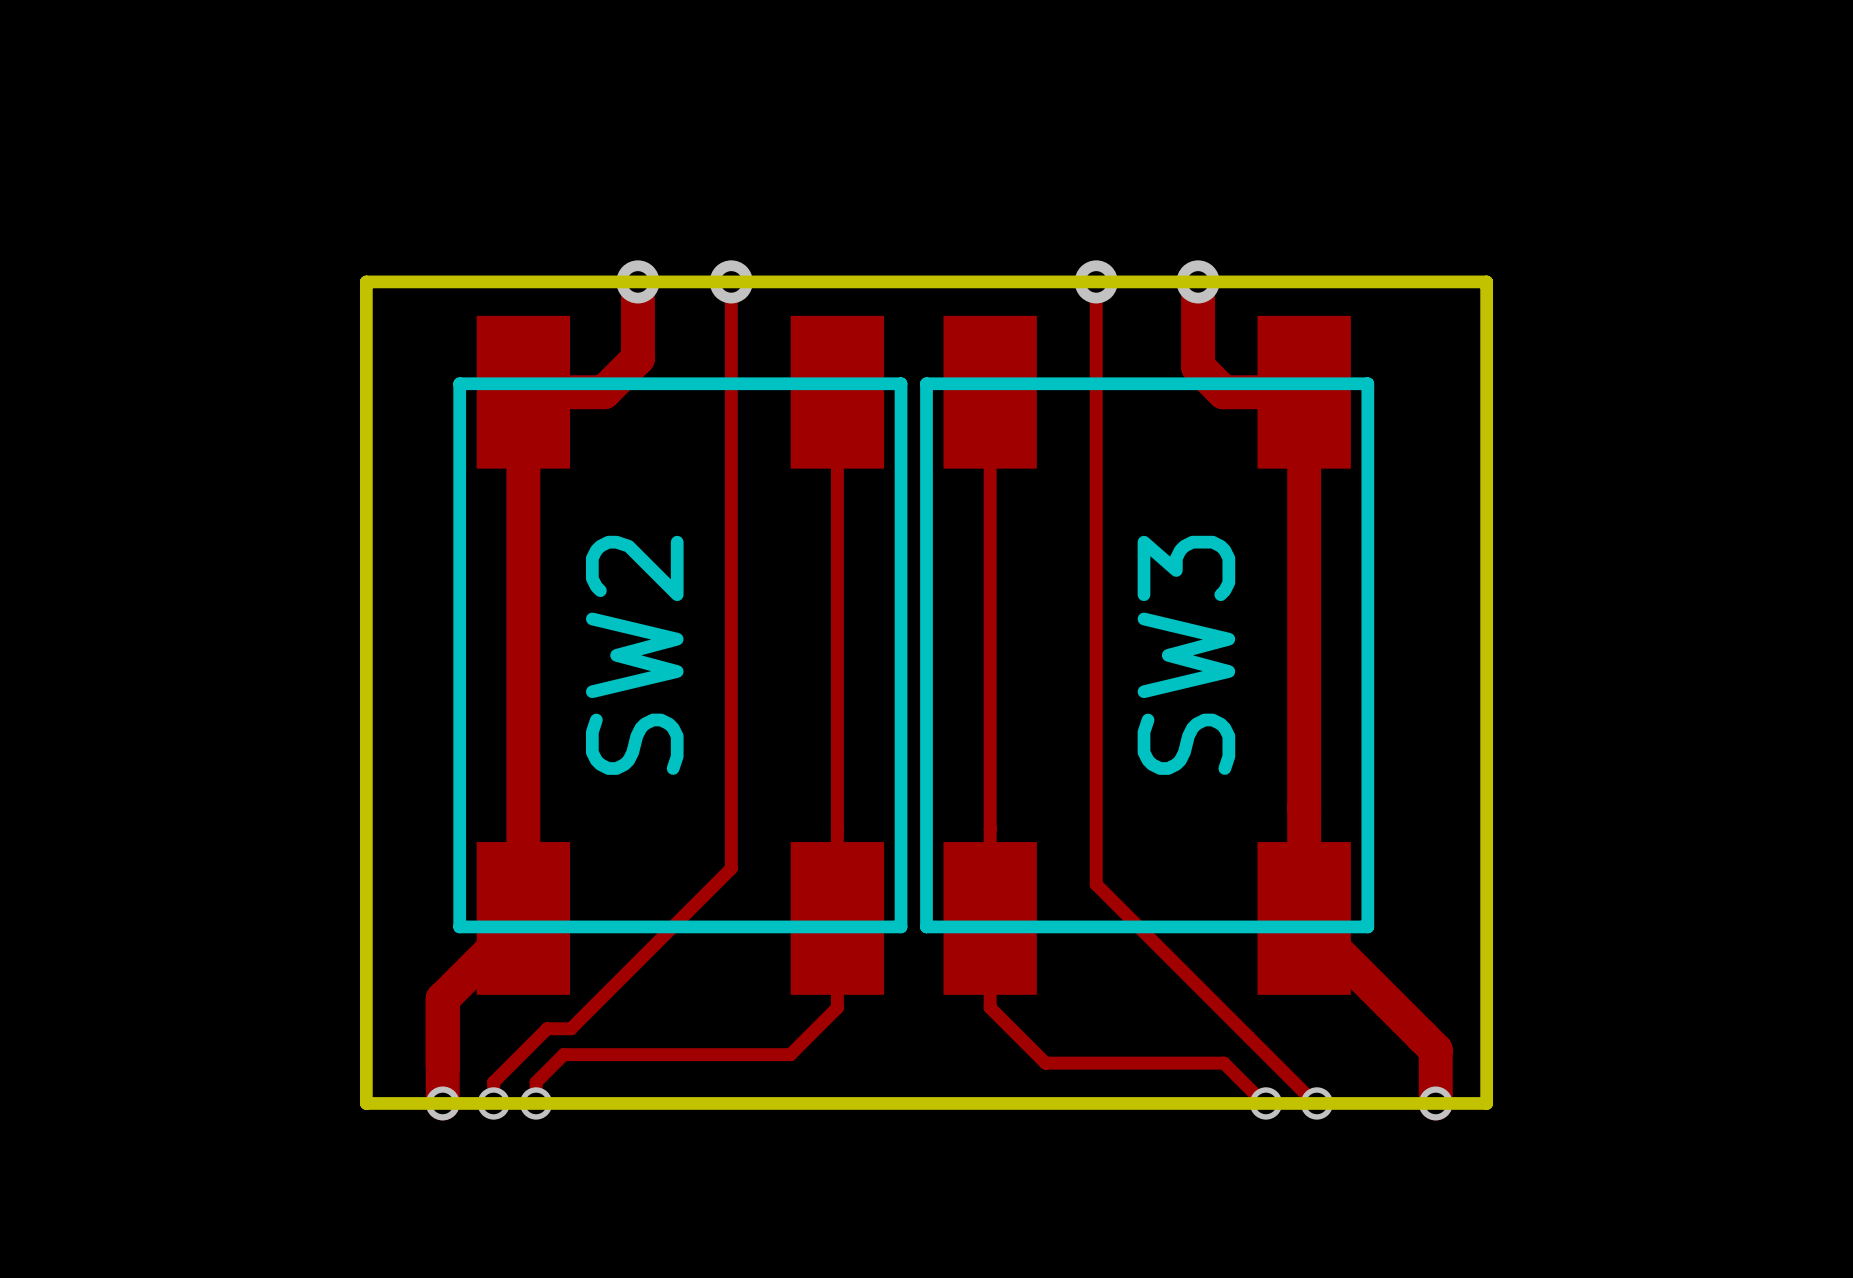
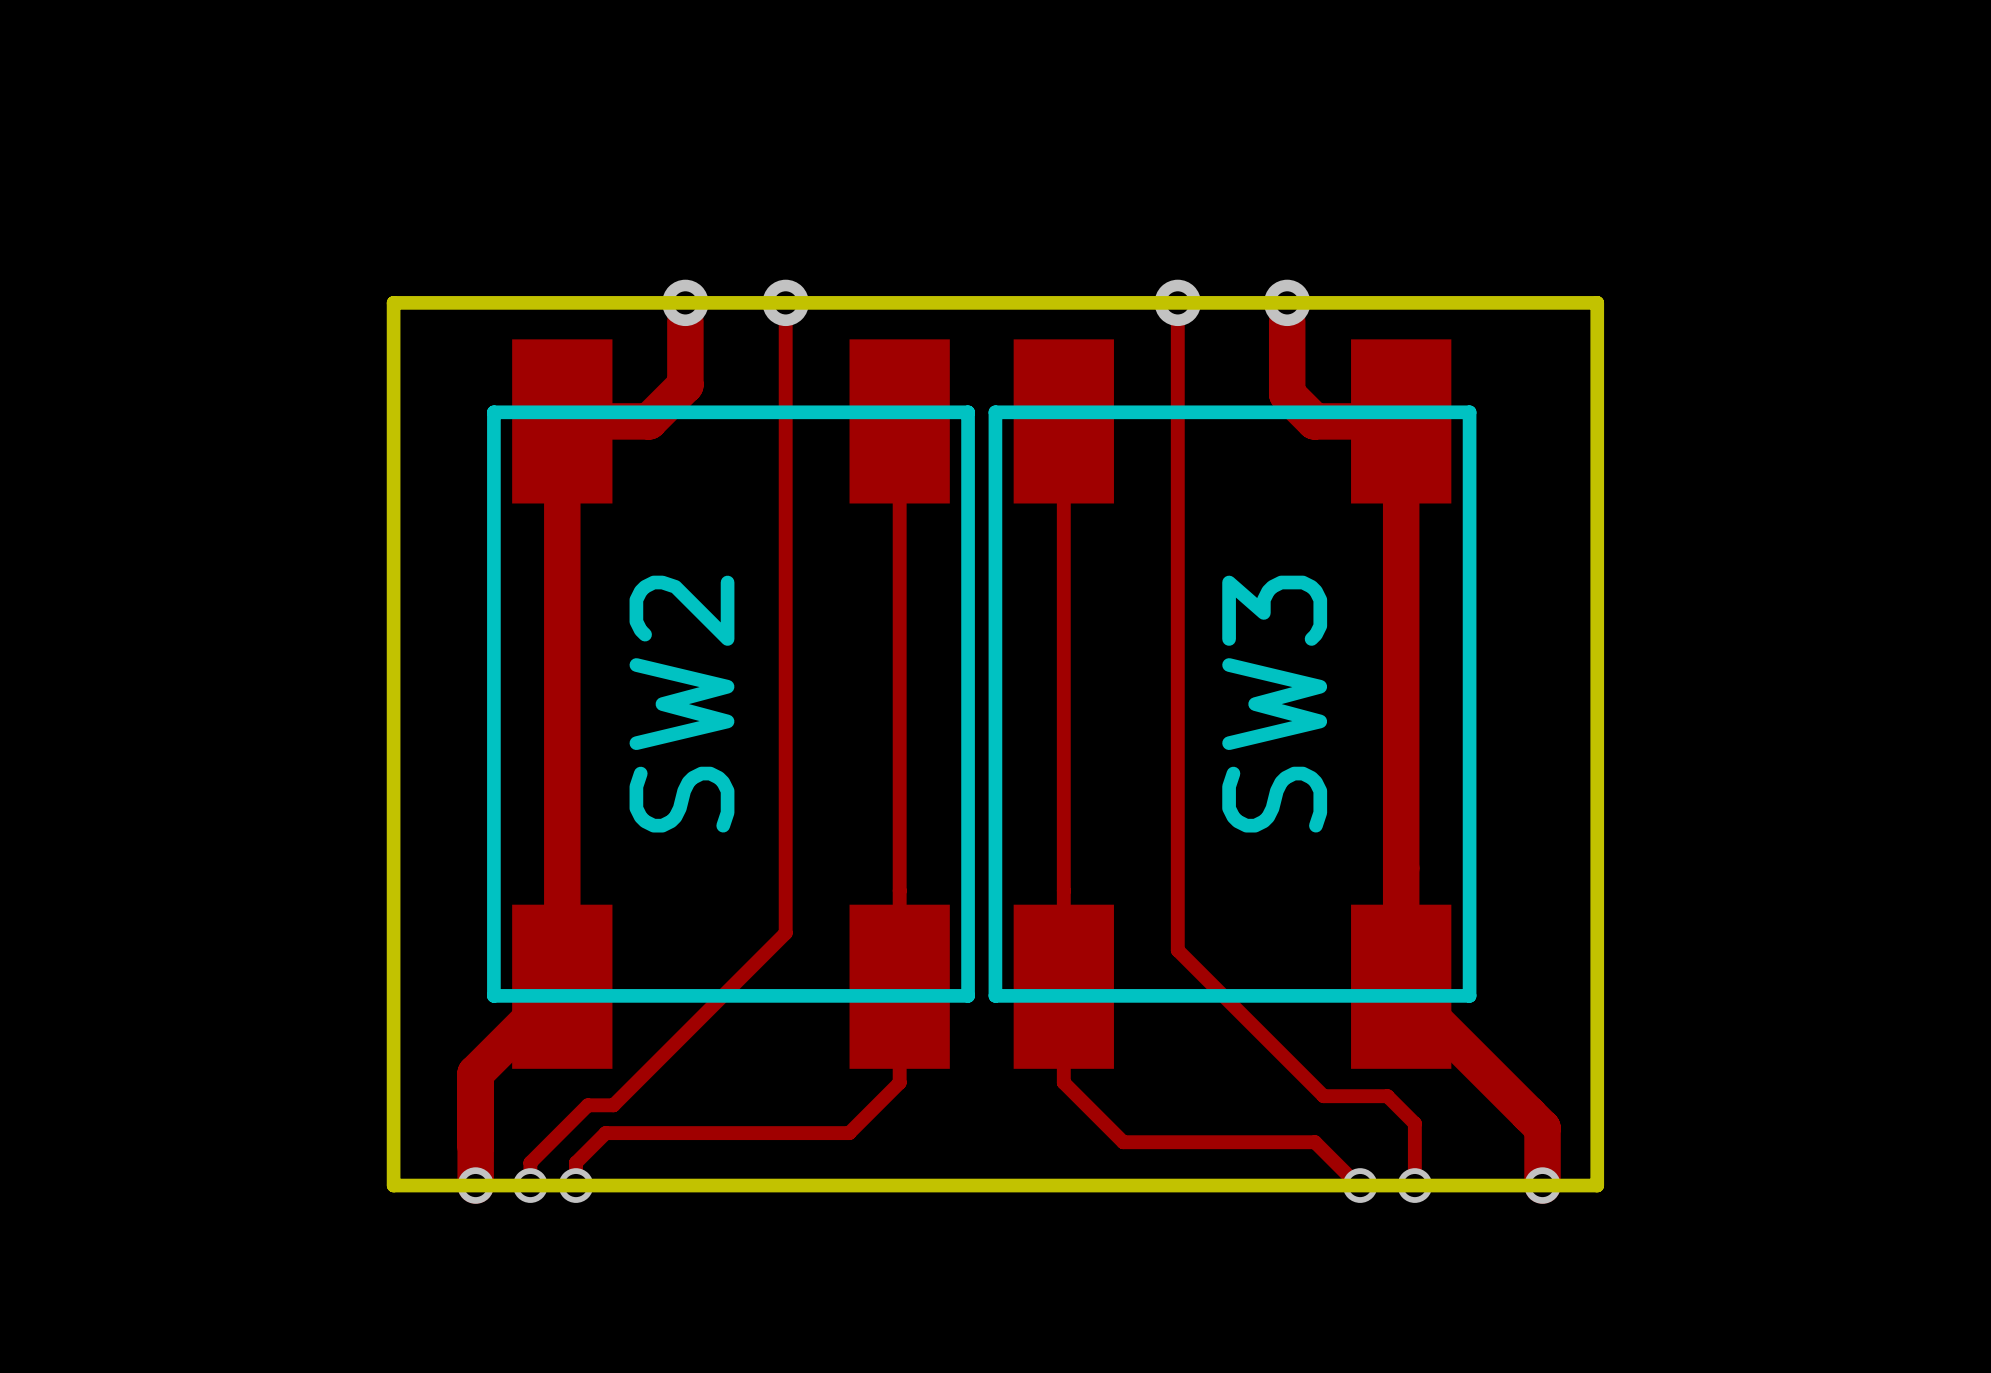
top track: (1232, 1020) (1316, 1105) -> (1323, 1096) (1387, 1096) (1414, 1123) (1414, 1185)

